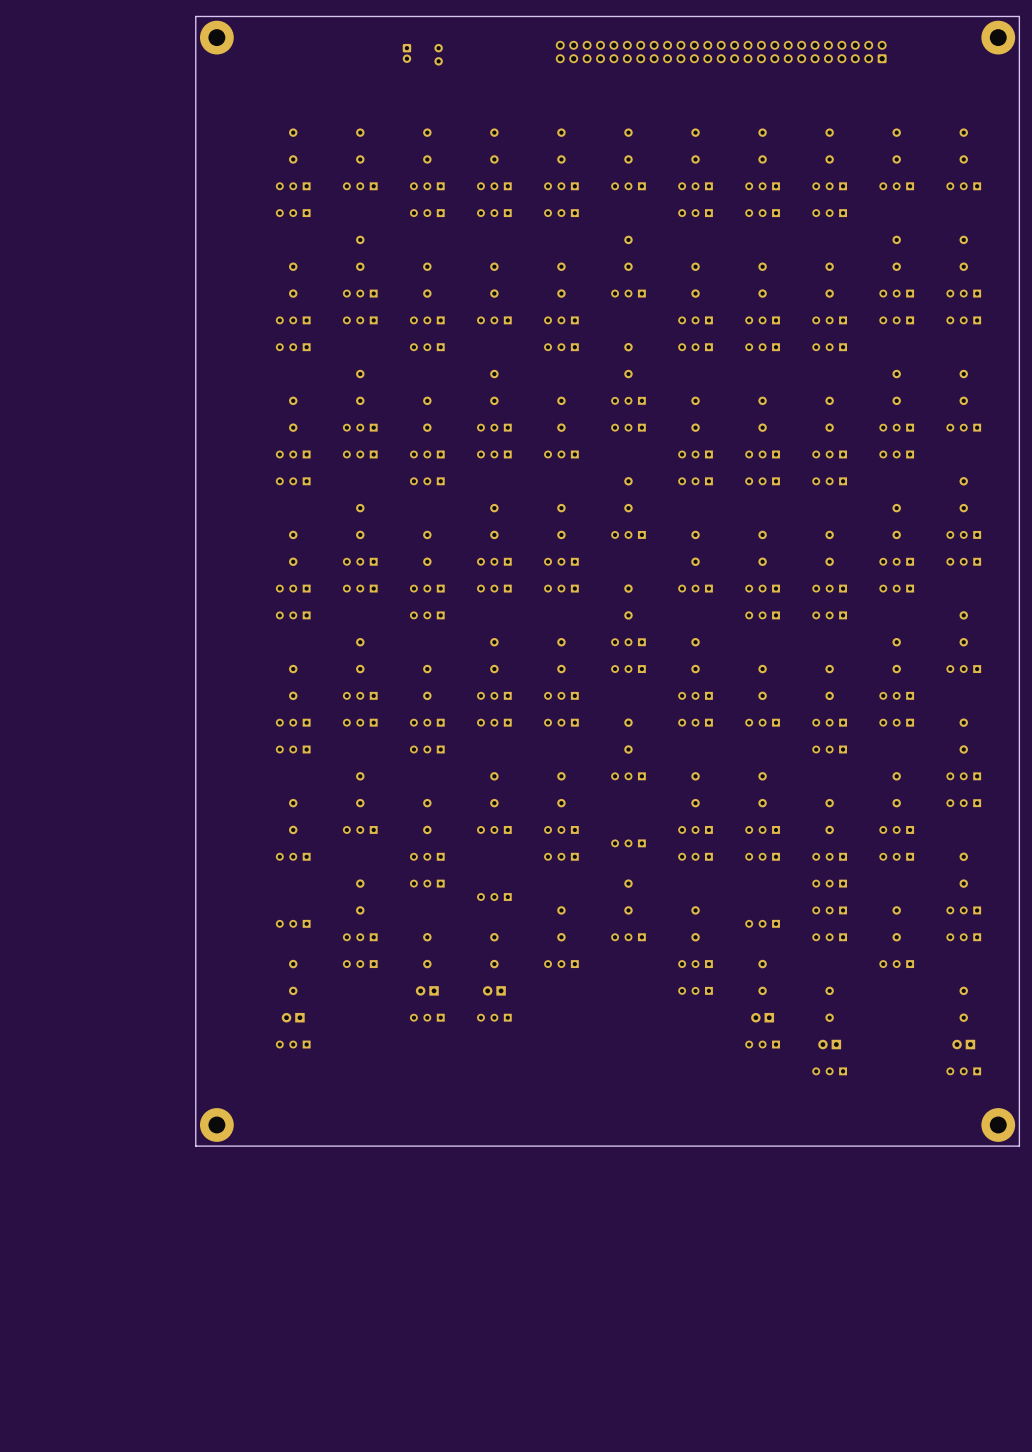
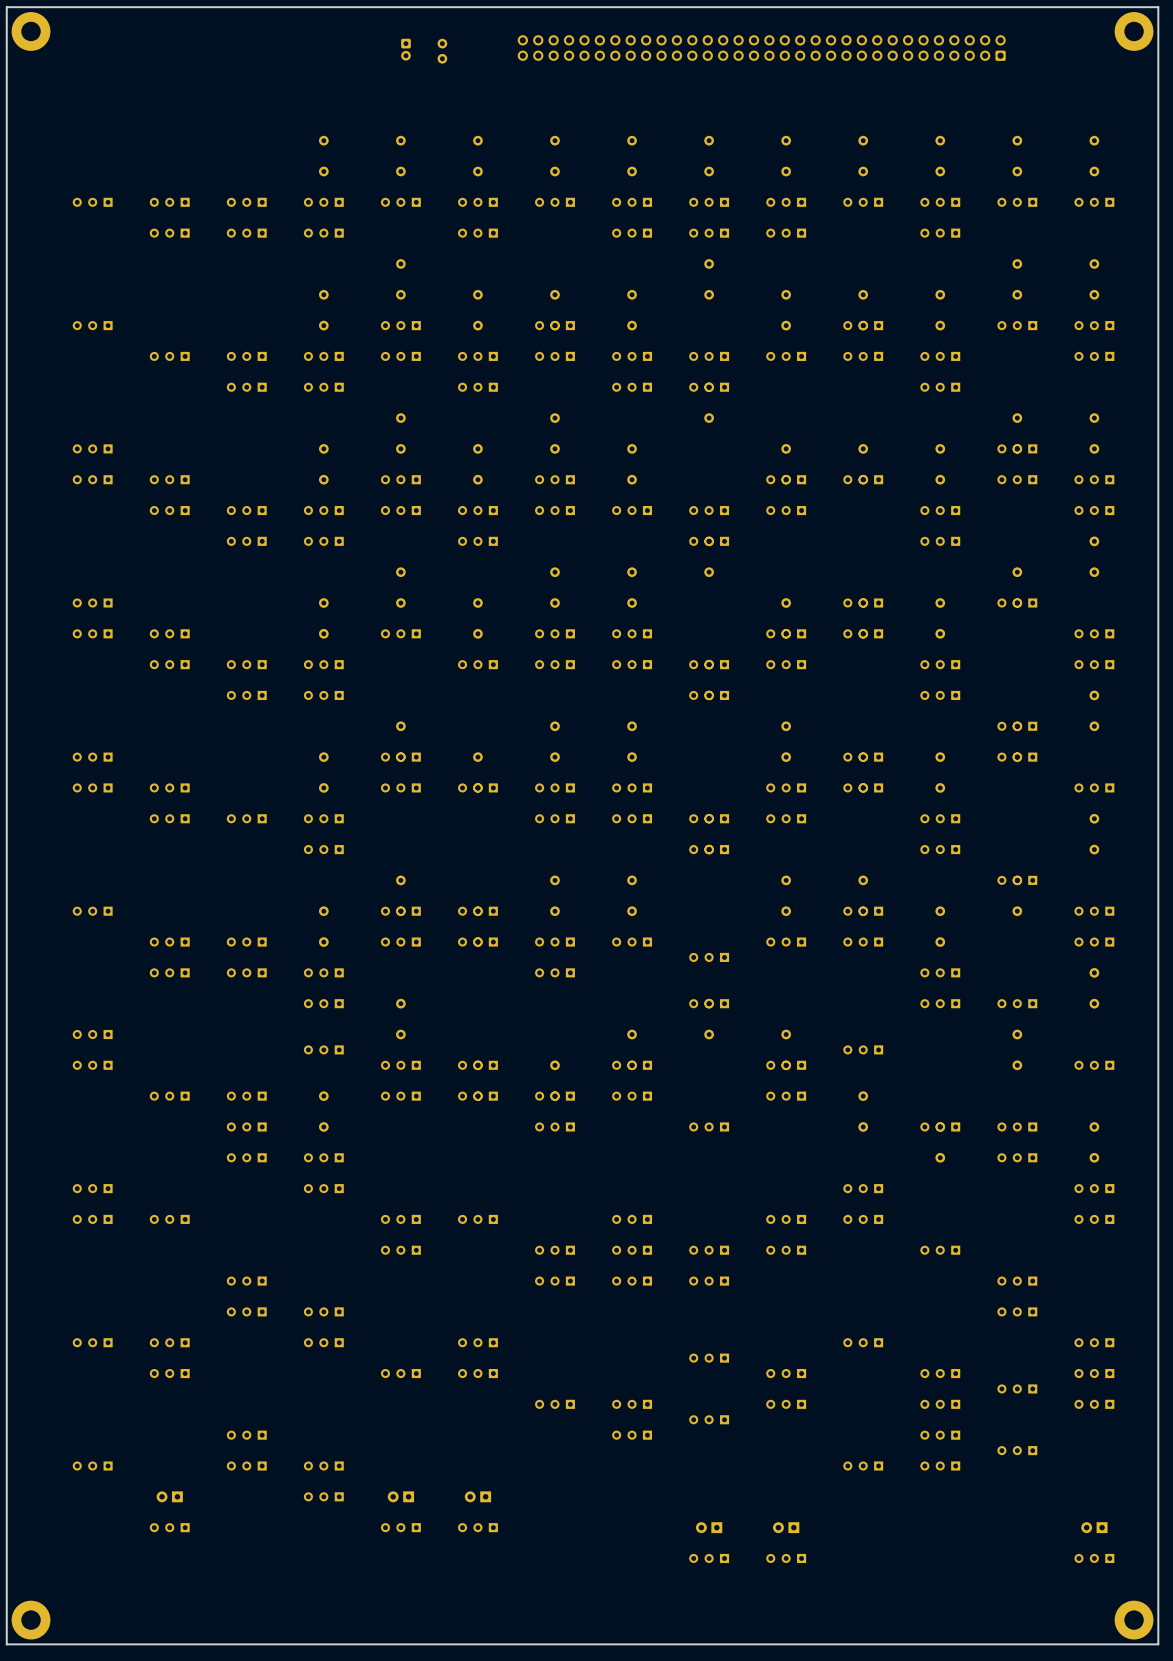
board edge: (195, 16) (195, 1146) (1019, 1146) -> (211, 7) (6, 7) (6, 1644) (1158, 1644) (1158, 1305)
part: none -> (31, 31)
part: (216, 37) -> none
part: none -> (761, 48)
part position: (406, 53) -> (405, 49)
part position: (438, 54) -> (442, 51)
part: none -> (92, 202)
part: none -> (169, 202)
part: none -> (246, 202)
part: none -> (169, 233)
part: none -> (246, 233)
part: (494, 213) -> none
part: none -> (709, 233)
part: (762, 213) -> none
part: none -> (92, 325)
part: none -> (555, 325)
part: (628, 293) -> none
part: none -> (863, 325)
part: none -> (169, 356)
part: none -> (246, 356)
part: none -> (709, 356)
part: (896, 320) -> none
part: none -> (246, 387)
part: none -> (709, 387)
part: (695, 347) -> none
part: (762, 347) -> none
part: none -> (92, 448)
part: (628, 400) -> none
part: none -> (1017, 448)
part: none -> (92, 479)
part: none -> (169, 479)
part: (628, 427) -> none
part: none -> (786, 479)
part: none -> (863, 479)
part: none -> (169, 510)
part: none -> (246, 510)
part: none -> (709, 510)
part: (762, 454) -> none
part: (896, 454) -> none
part: none -> (1094, 510)
part: none -> (246, 541)
part: none -> (709, 541)
part: (695, 481) -> none
part: (762, 481) -> none
part: none -> (92, 602)
part: (628, 534) -> none
part: none -> (863, 602)
part: none -> (1017, 602)
part: (963, 534) -> none
part: none -> (92, 633)
part: none -> (169, 633)
part: none -> (786, 633)
part: none -> (863, 633)
part: (896, 561) -> none
part: none -> (169, 664)
part: none -> (246, 664)
part: (360, 588) -> none
part: none -> (709, 664)
part: (762, 588) -> none
part: (896, 588) -> none
part: none -> (1094, 664)
part: none -> (246, 695)
part: (427, 615) -> none
part: none -> (709, 695)
part: (762, 615) -> none
part: (628, 642) -> none
part: none -> (1017, 726)
part: none -> (92, 757)
part: none -> (400, 757)
part: (628, 669) -> none
part: none -> (863, 757)
part: none -> (1017, 757)
part position: (963, 669) -> (1094, 787)
part: none -> (92, 787)
part: none -> (169, 787)
part: none -> (477, 787)
part: none -> (863, 787)
part: (896, 695) -> none
part: none -> (169, 818)
part: none -> (246, 818)
part: (360, 722) -> none
part: (427, 722) -> none
part: none -> (709, 818)
part: (762, 722) -> none
part: (896, 722) -> none
part: (427, 749) -> none
part: none -> (709, 849)
part: (628, 776) -> none
part: none -> (1017, 880)
part: (963, 776) -> none
part: none -> (92, 911)
part: none -> (400, 911)
part: none -> (477, 911)
part: none -> (863, 911)
part: none -> (169, 942)
part: none -> (246, 942)
part: none -> (477, 942)
part: (896, 829) -> none
part: none -> (1094, 942)
part: none -> (169, 972)
part: none -> (246, 972)
part: (427, 856) -> none
part: none -> (555, 972)
part: (561, 856) -> none
part: (695, 856) -> none
part: (762, 856) -> none
part: (896, 856) -> none
part: none -> (323, 1003)
part: (427, 883) -> none
part: none -> (709, 1003)
part: none -> (1017, 1003)
part: (494, 897) -> none
part: none -> (92, 1034)
part: (829, 910) -> none
part: (963, 910) -> none
part: none -> (92, 1065)
part: none -> (477, 1065)
part: none -> (632, 1065)
part: (628, 937) -> none
part: none -> (786, 1065)
part: (829, 937) -> none
part: none -> (169, 1096)
part: none -> (246, 1096)
part: none -> (477, 1096)
part: none -> (555, 1096)
part: (896, 964) -> none
part footprint: [482, 986, 506, 996] -> [535, 1122, 575, 1132]
part: none -> (246, 1126)
part: (427, 990) -> none
part: none -> (709, 1126)
part: (695, 990) -> none
part: none -> (940, 1126)
part: none -> (1017, 1126)
part footprint: [281, 1012, 305, 1023] -> [303, 1153, 344, 1163]
part: none -> (246, 1157)
part: (427, 1017) -> none
part: (494, 1017) -> none
part: (762, 1017) -> none
part: none -> (1017, 1157)
part footprint: [952, 1039, 976, 1050] -> [1074, 1184, 1115, 1194]
part: none -> (92, 1188)
part: (829, 1044) -> none
part: none -> (92, 1219)
part: none -> (169, 1219)
part: none -> (400, 1219)
part: none -> (477, 1219)
part: none -> (632, 1219)
part: none -> (786, 1219)
part: none -> (863, 1219)
part position: (829, 1071) -> (940, 1250)
part: none -> (400, 1250)
part: none -> (555, 1250)
part: none -> (632, 1250)
part: none -> (709, 1250)
part: none -> (786, 1250)
part: (216, 1124) -> none
part: none -> (246, 1281)
part: none -> (555, 1281)
part: none -> (632, 1281)
part: none -> (709, 1281)
part: none -> (1017, 1281)
part: (998, 1124) -> none
part: none -> (246, 1311)
part: none -> (323, 1311)
part: none -> (1017, 1311)
part: none -> (92, 1342)
part: none -> (169, 1342)
part: none -> (323, 1342)
part: none -> (477, 1342)
part: none -> (863, 1342)
part: none -> (1094, 1342)
part: none -> (709, 1358)
part: none -> (169, 1373)
part: none -> (400, 1373)
part: none -> (477, 1373)
part: none -> (786, 1373)
part: none -> (940, 1373)
part: none -> (1094, 1373)
part: none -> (1017, 1388)
part: none -> (555, 1404)
part: none -> (632, 1404)
part: none -> (786, 1404)
part: none -> (940, 1404)
part: none -> (1094, 1404)
part: none -> (709, 1419)
part: none -> (246, 1435)
part: none -> (632, 1435)
part: none -> (940, 1435)
part: none -> (1017, 1450)
part: none -> (92, 1465)
part: none -> (246, 1465)
part: none -> (323, 1465)
part: none -> (863, 1465)
part: none -> (940, 1465)
part: none -> (169, 1496)
part: none -> (323, 1496)
part: none -> (400, 1496)
part: none -> (477, 1496)
part: none -> (169, 1527)
part: none -> (400, 1527)
part: none -> (477, 1527)
part: none -> (709, 1527)
part: none -> (786, 1527)
part: none -> (1094, 1527)
part: none -> (709, 1558)
part: none -> (786, 1558)
part: none -> (1094, 1558)
part: none -> (31, 1620)
part: none -> (1134, 1620)

